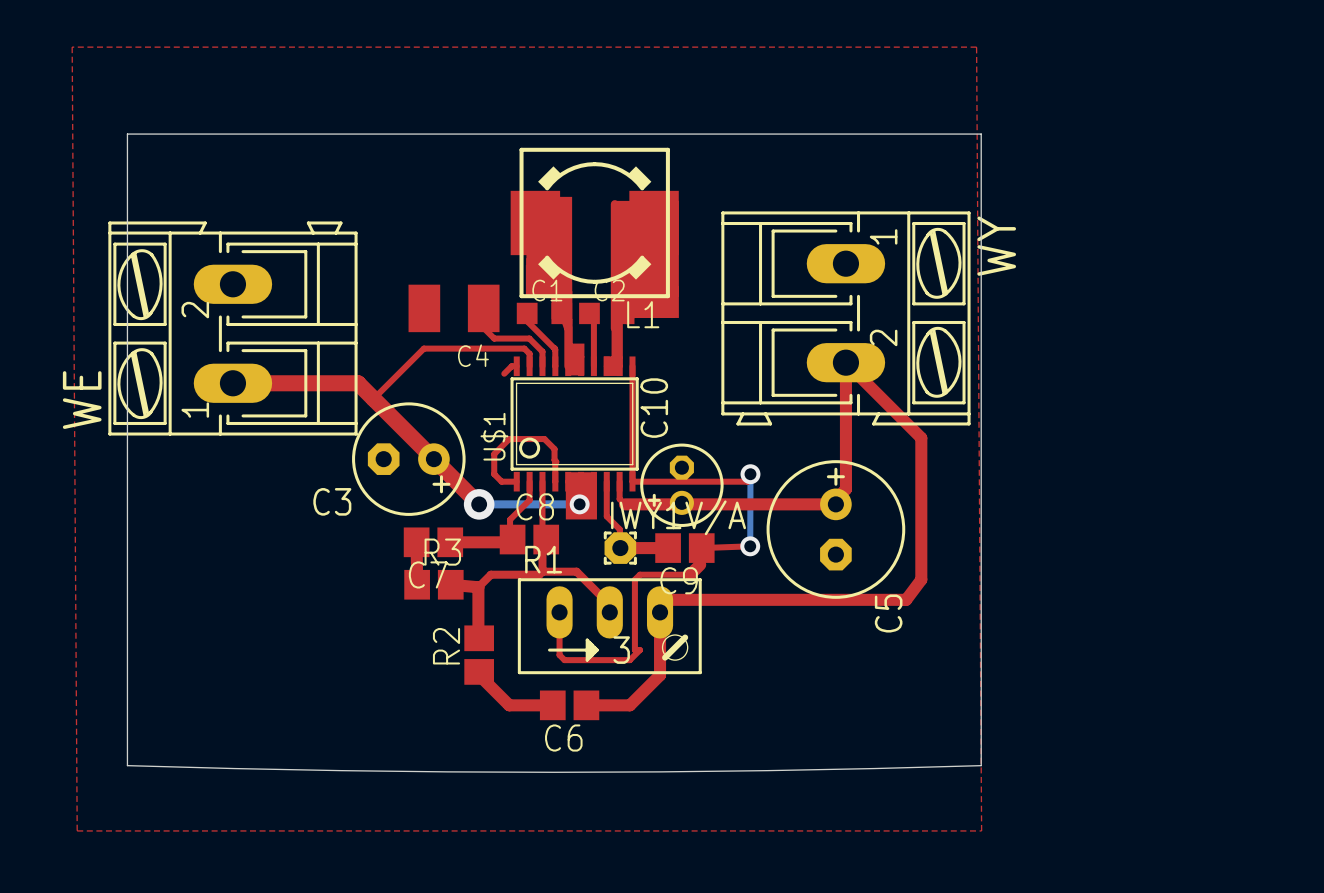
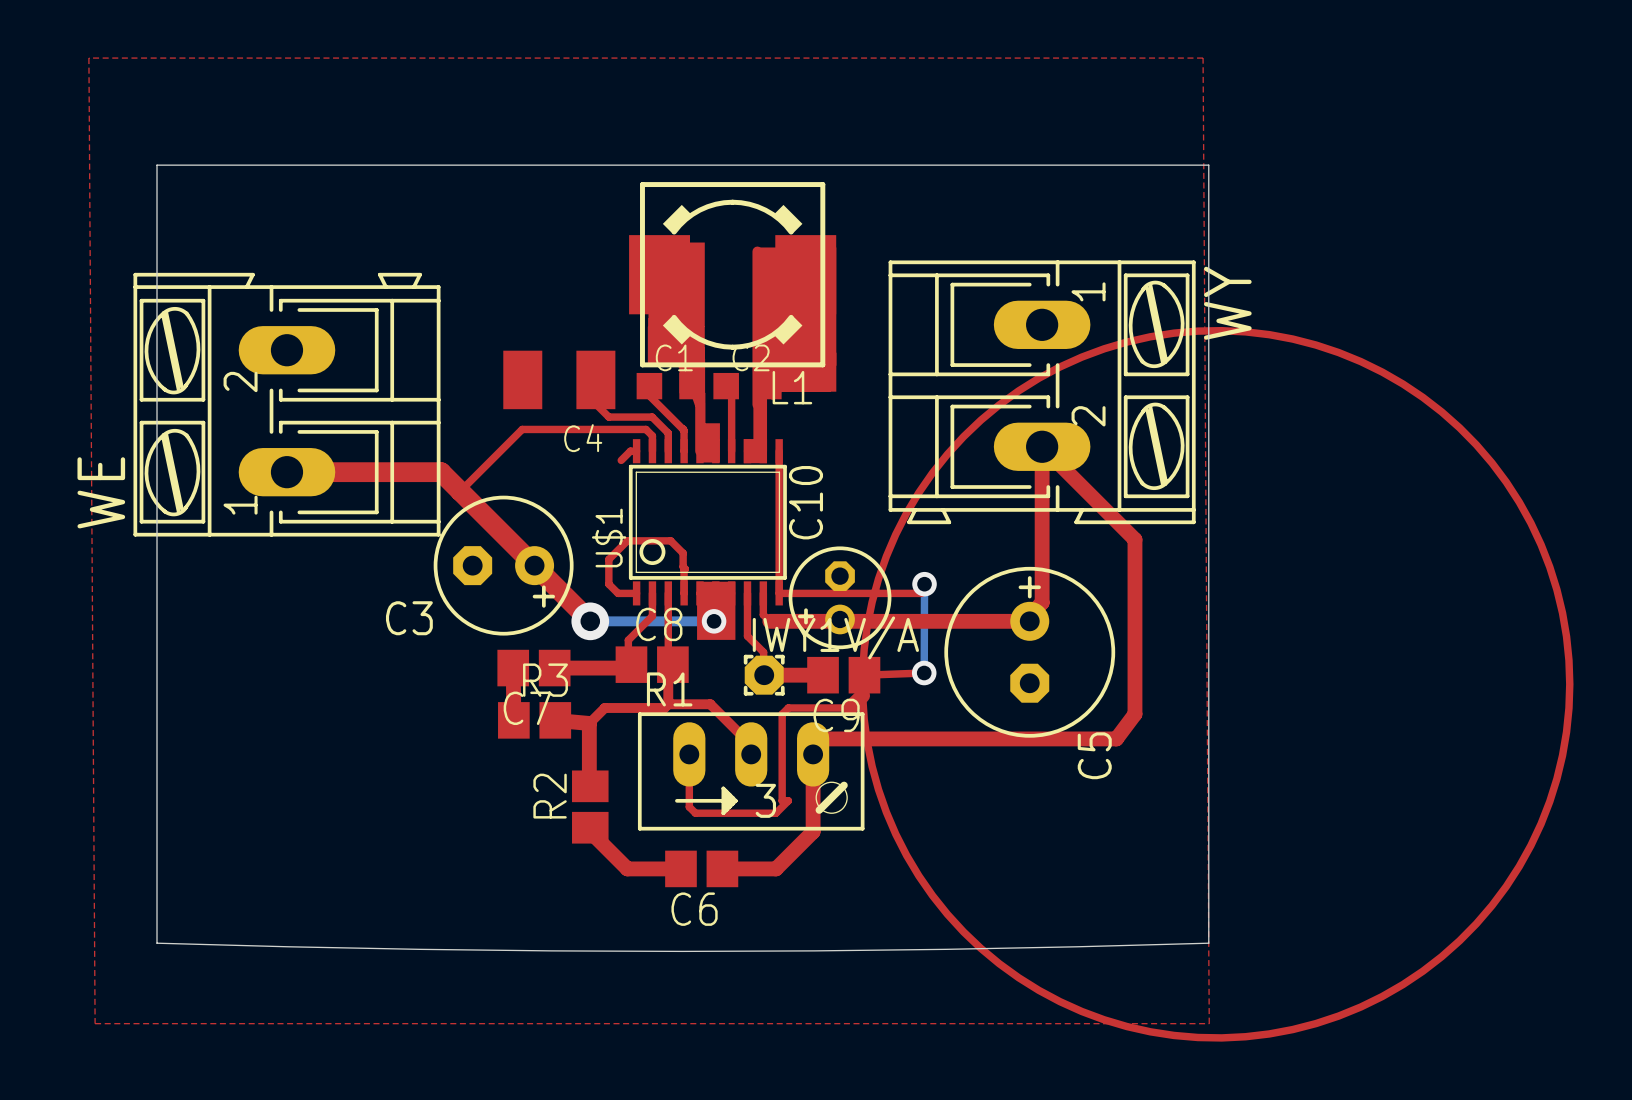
top track: none -> (862, 672) (864, 649) (872, 602) (886, 556) (895, 534) (906, 513) (932, 472) (947, 454) (980, 420) (999, 404) (1038, 378) (1081, 357) (1127, 342) (1150, 336) (1174, 333) (1221, 330) (1269, 334) (1292, 339) (1338, 352) (1360, 361) (1382, 372) (1422, 397) (1441, 411) (1476, 444) (1506, 482) (1530, 523) (1541, 544) (1556, 589) (1562, 613) (1566, 636) (1569, 684) (1566, 731) (1562, 755) (1556, 778) (1541, 823) (1519, 866) (1492, 905) (1476, 923) (1459, 940) (1422, 971) (1382, 996) (1360, 1007) (1338, 1016) (1292, 1029) (1245, 1036) (1221, 1037) (1197, 1037) (1150, 1031) (1104, 1019) (1059, 1001) (1038, 990) (999, 963) (980, 948) (947, 914) (932, 895) (906, 855) (895, 834) (878, 789) (872, 766) (867, 743) (862, 695)

